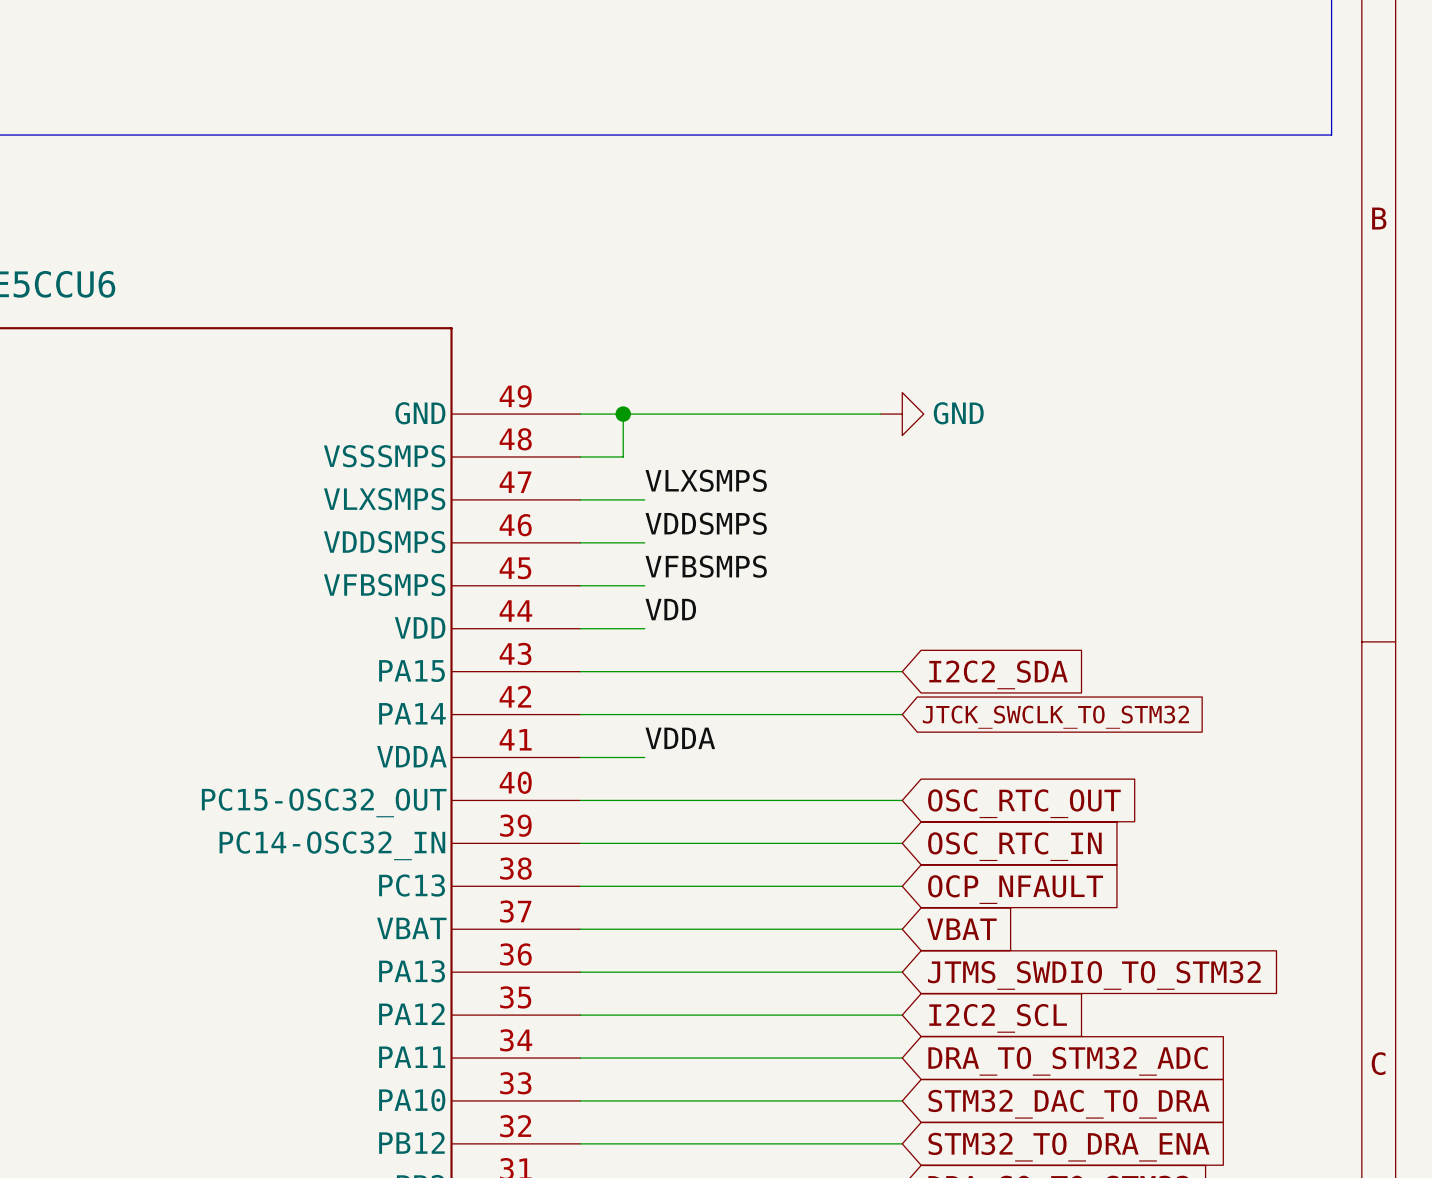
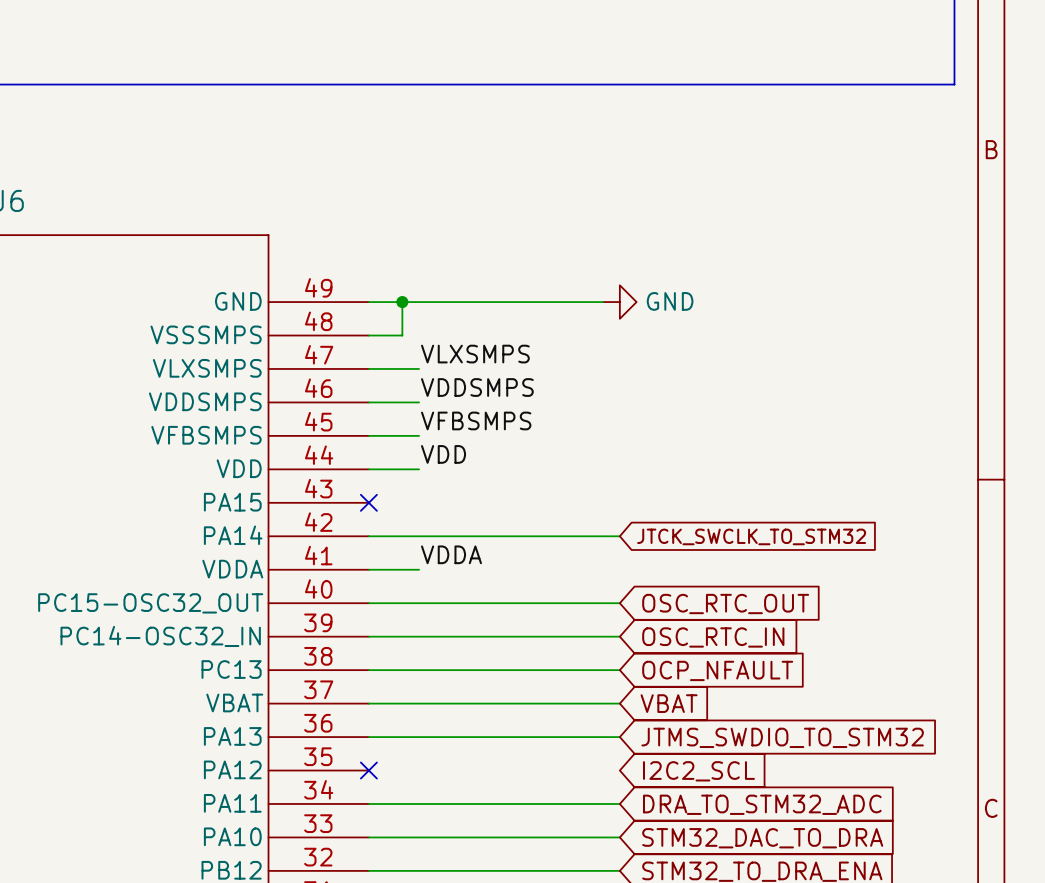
wire: (580, 671) (902, 671) -> none
no-connect mark: none -> (368, 502)
global label: I2C2_SDA (998, 674) -> none
wire: (580, 1015) (902, 1015) -> none
no-connect mark: none -> (368, 770)

